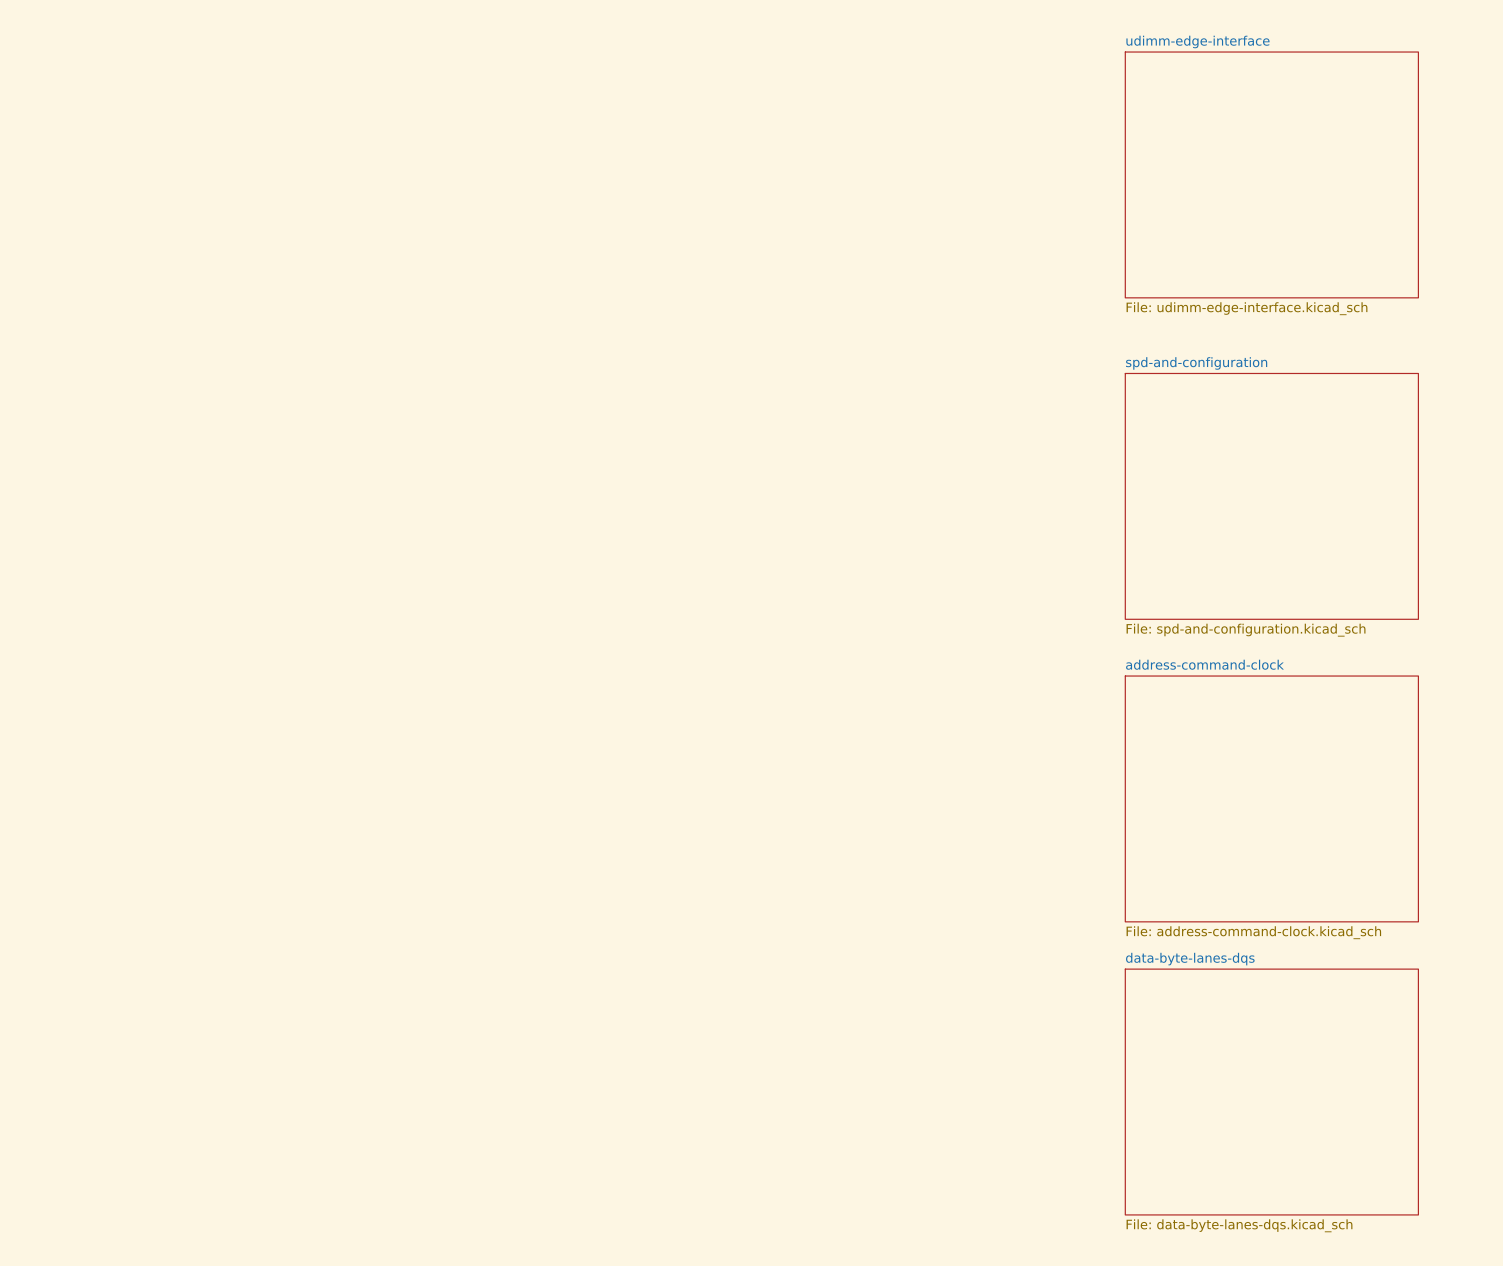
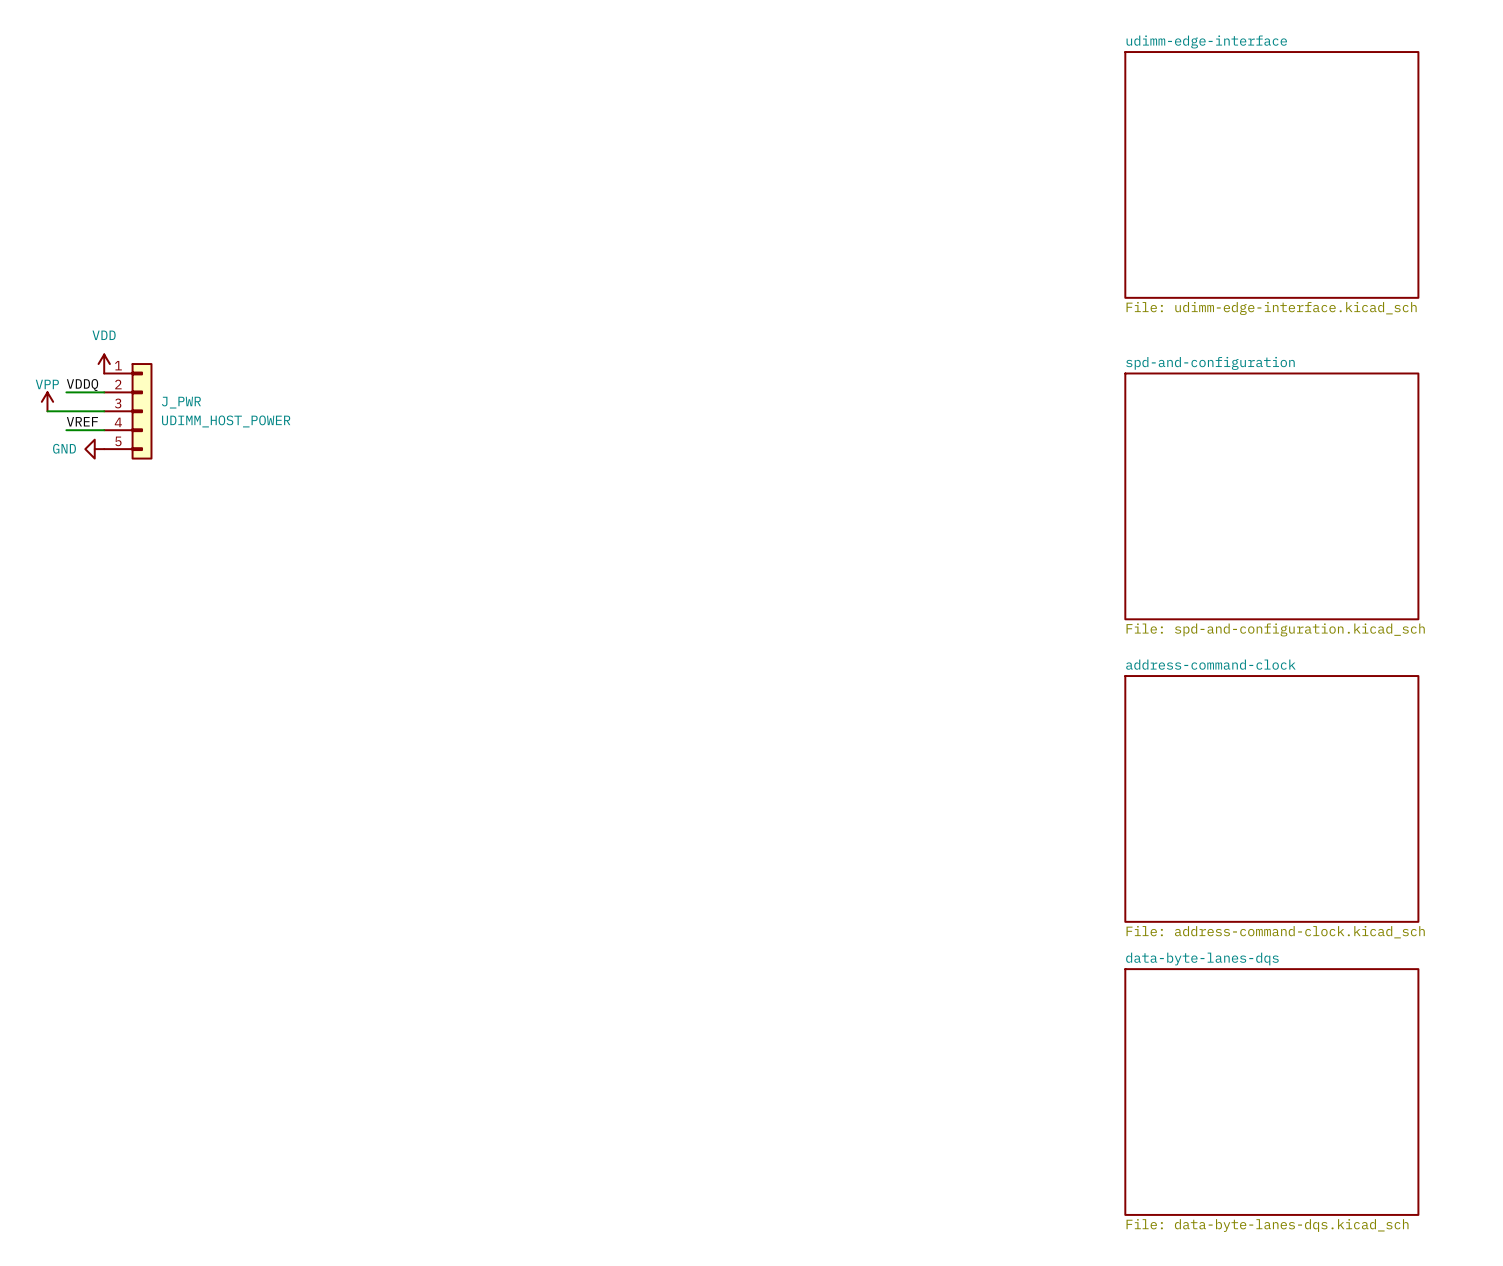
power symbol: none -> VDD (104, 364)
label: none -> VDDQ (82, 384)
wire: none -> (66, 392) (104, 392)
power symbol: none -> VPP (47, 401)
wire: none -> (47, 411) (104, 411)
J_PWR: none -> UDIMM_HOST_POWER (128, 411)
label: none -> VREF (82, 421)
wire: none -> (66, 430) (104, 430)
power symbol: none -> GND (94, 449)

